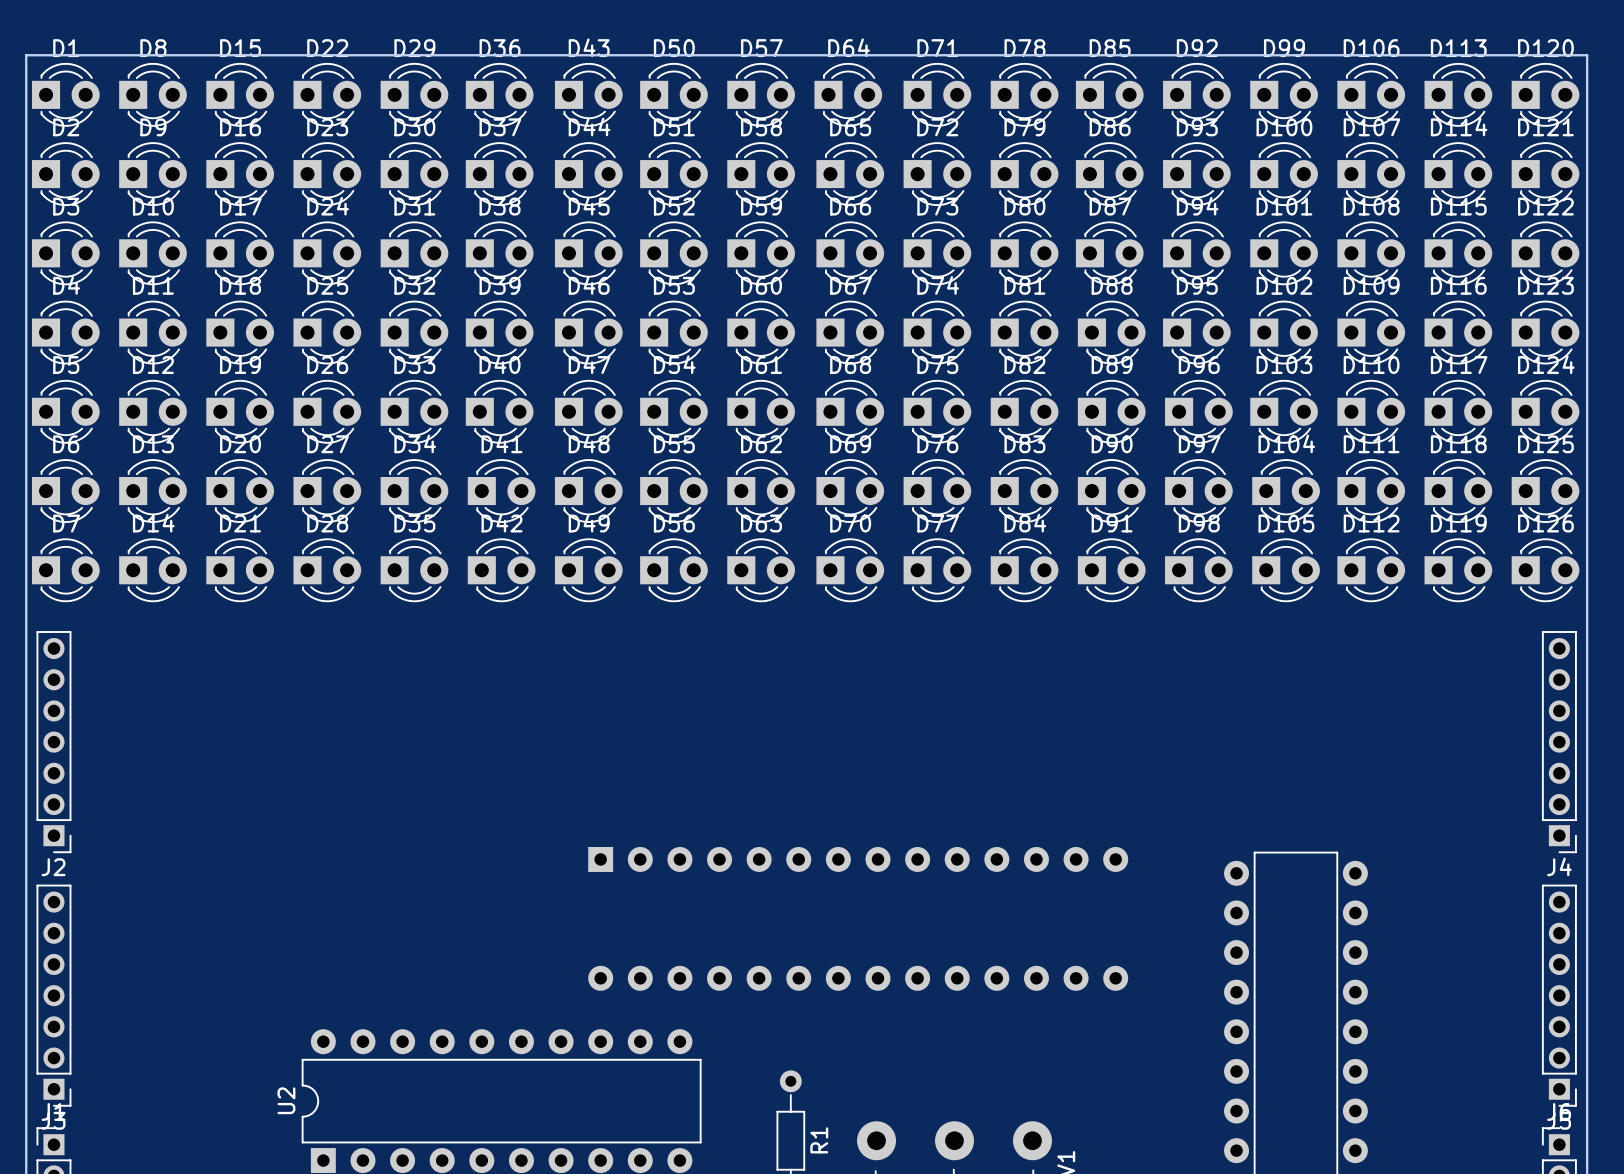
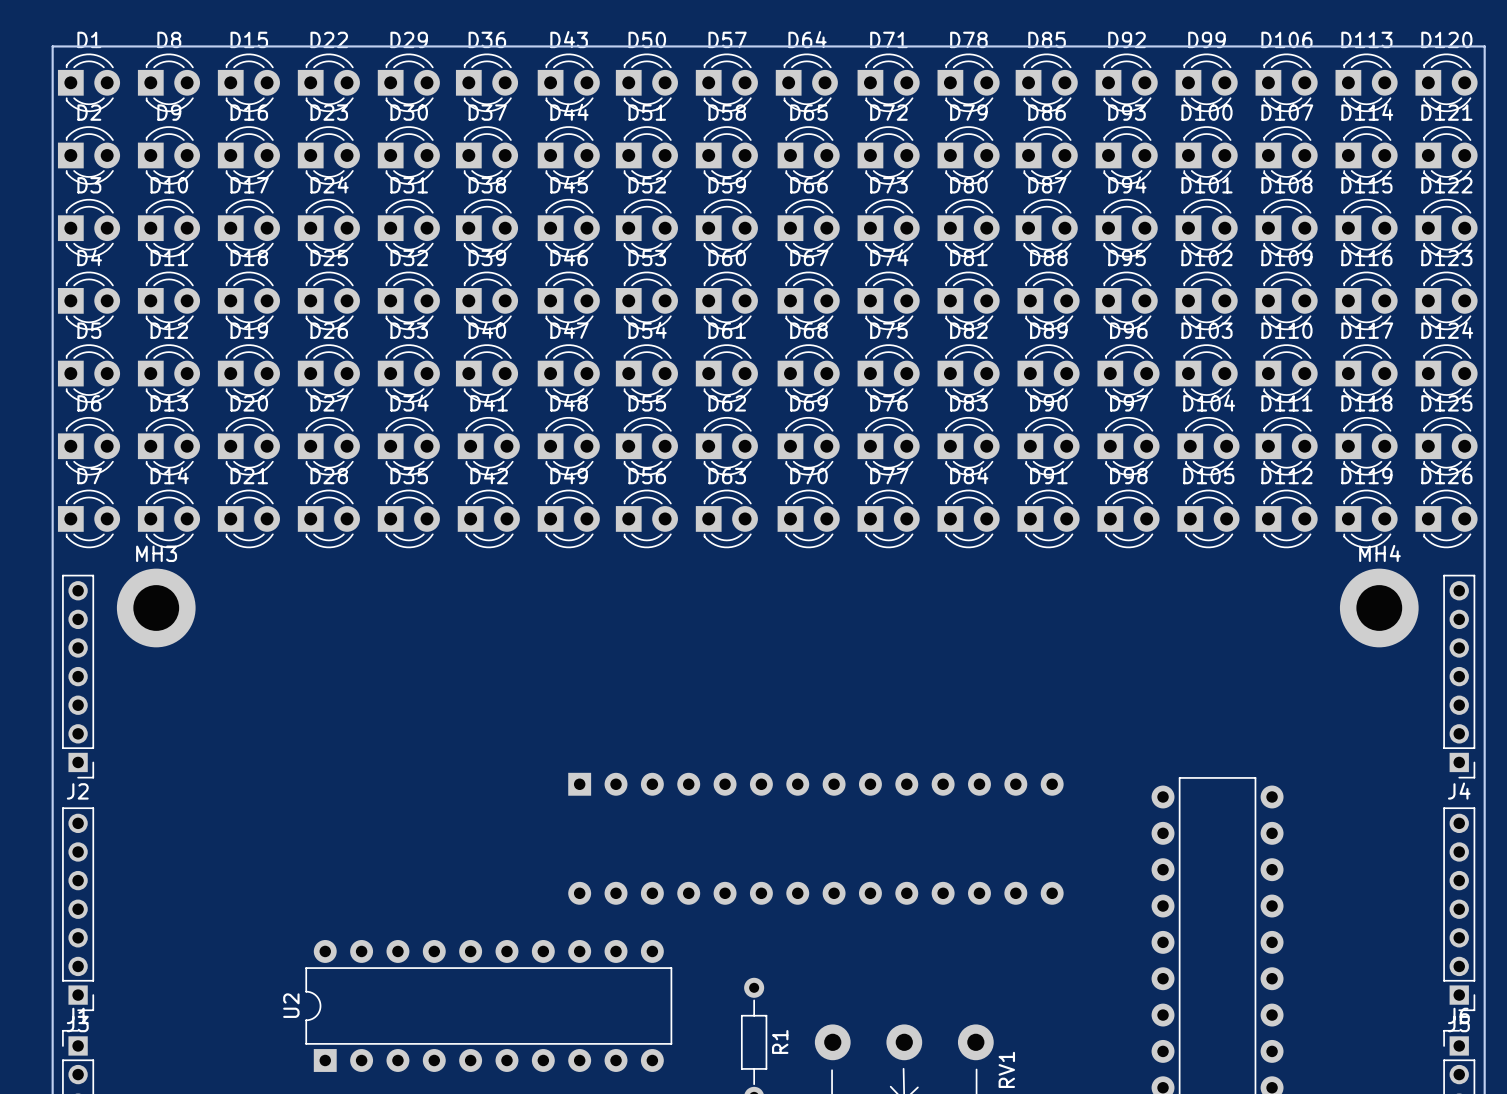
MH3: none -> (156, 607)
MH4: none -> (1379, 607)

